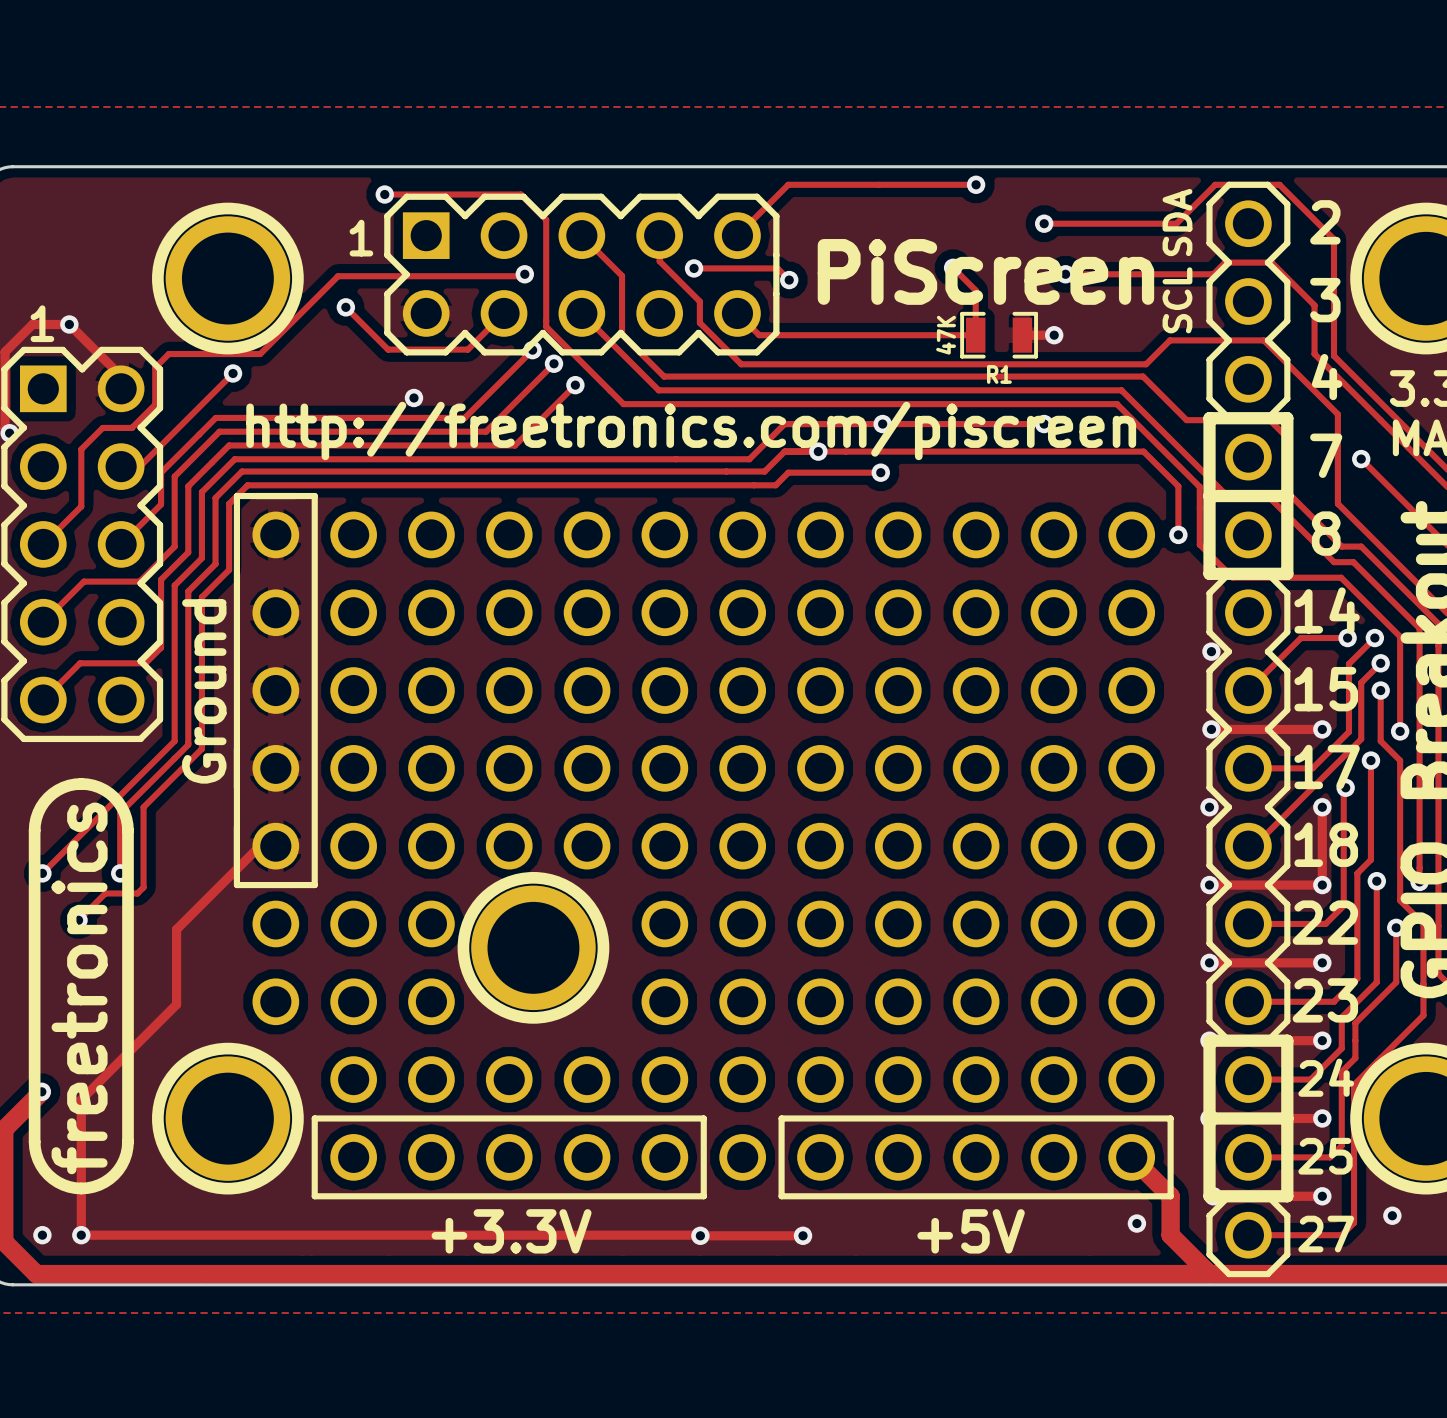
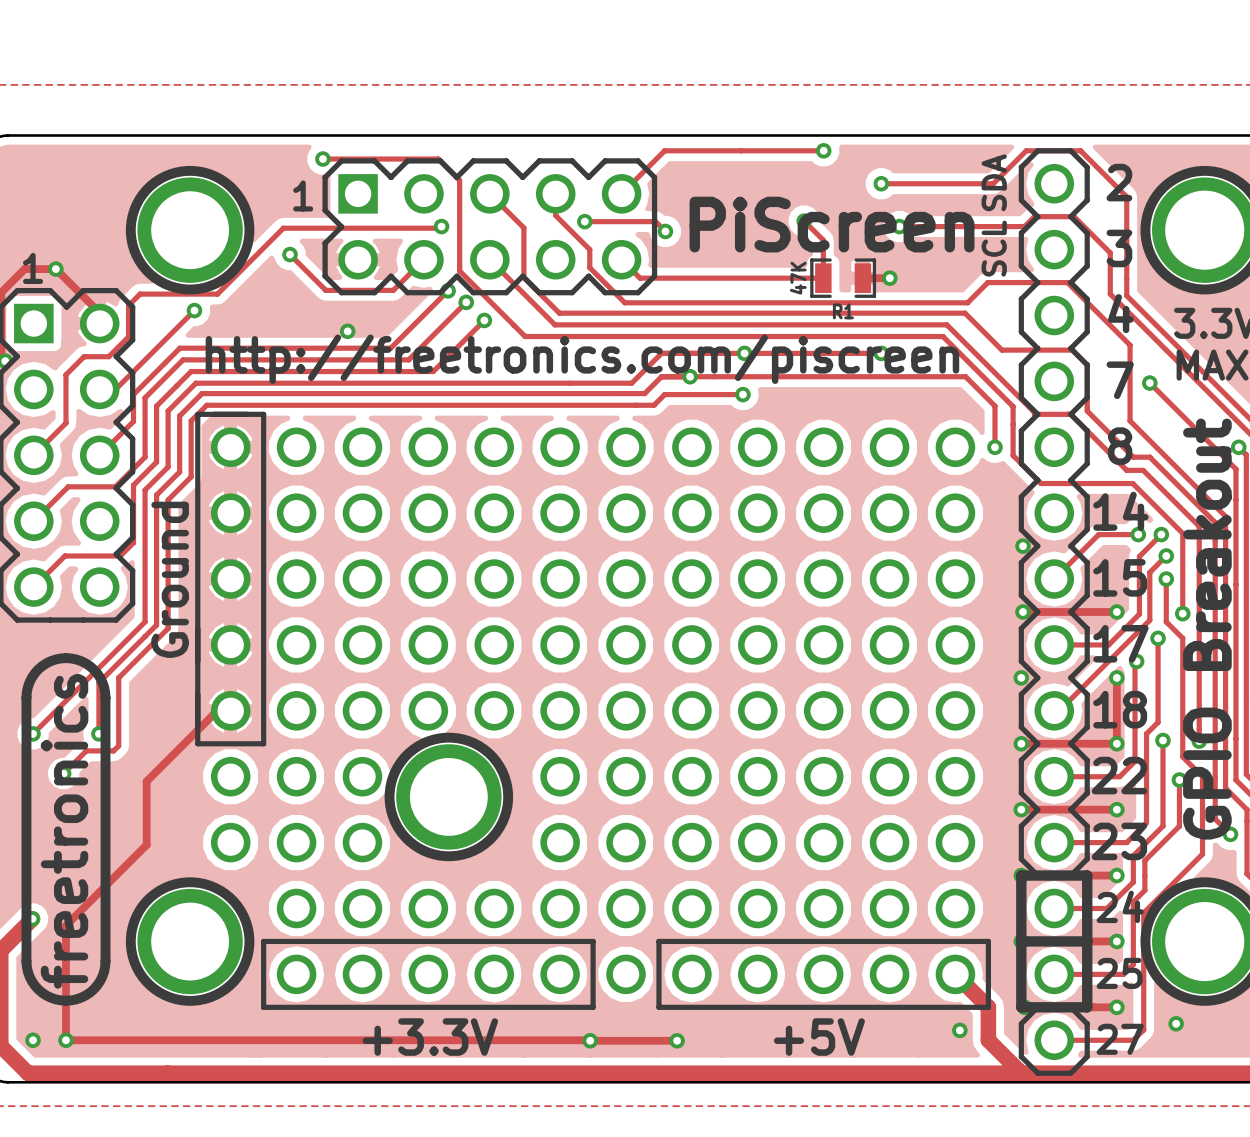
part footprint: [1206, 181, 1291, 1278] -> [1018, 148, 1090, 1076]
line: (1209, 418) (1287, 418) (1287, 573) (1209, 573) (1209, 418) -> none
line: (1209, 496) (1287, 496) -> none

